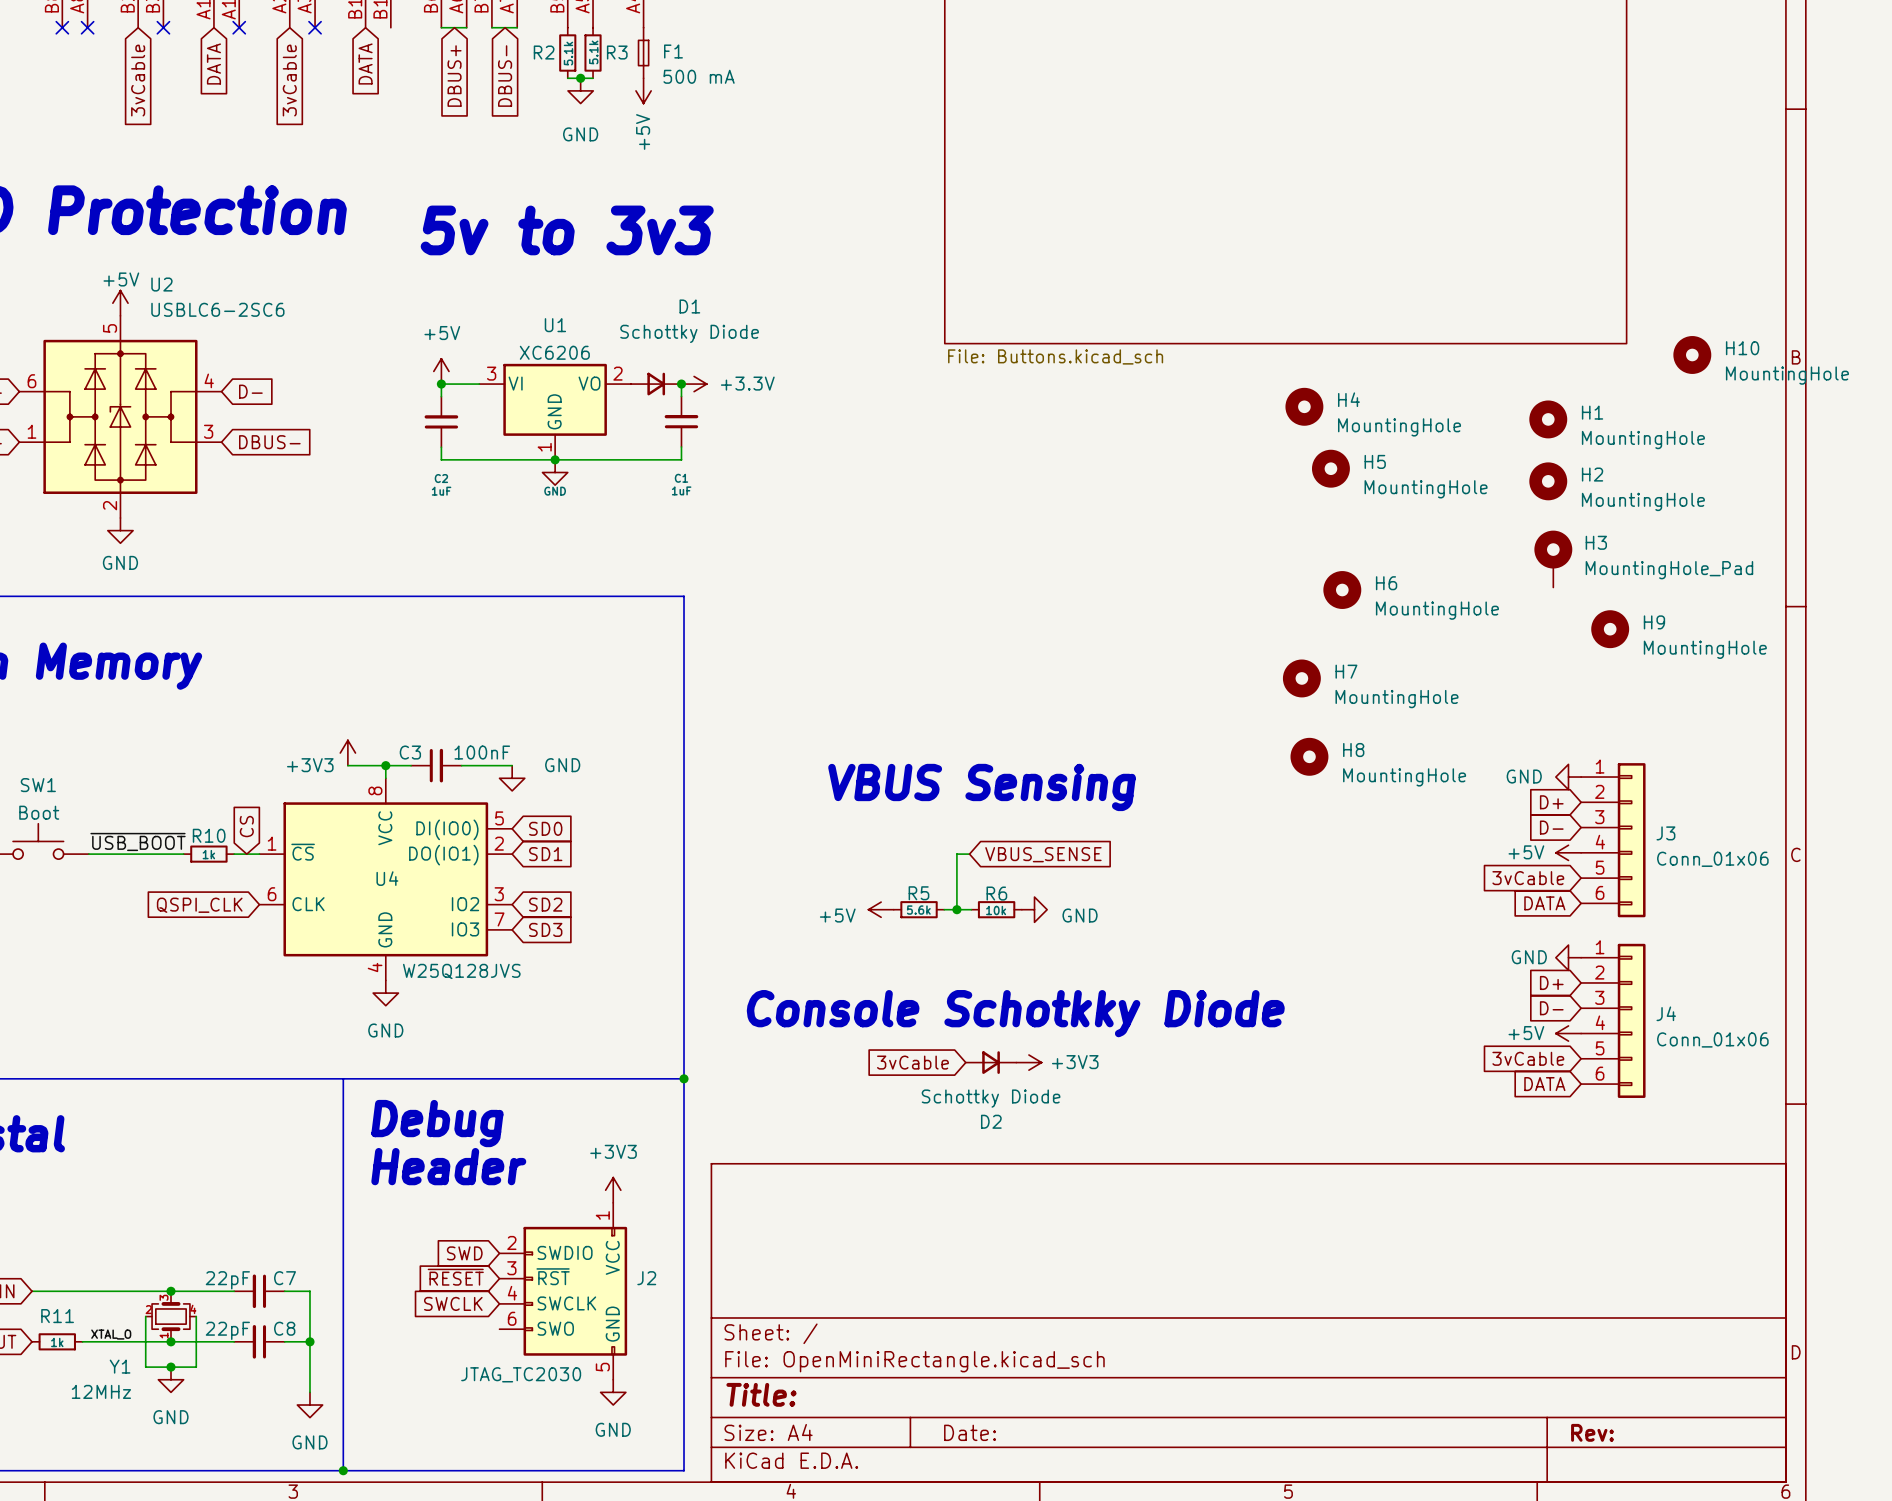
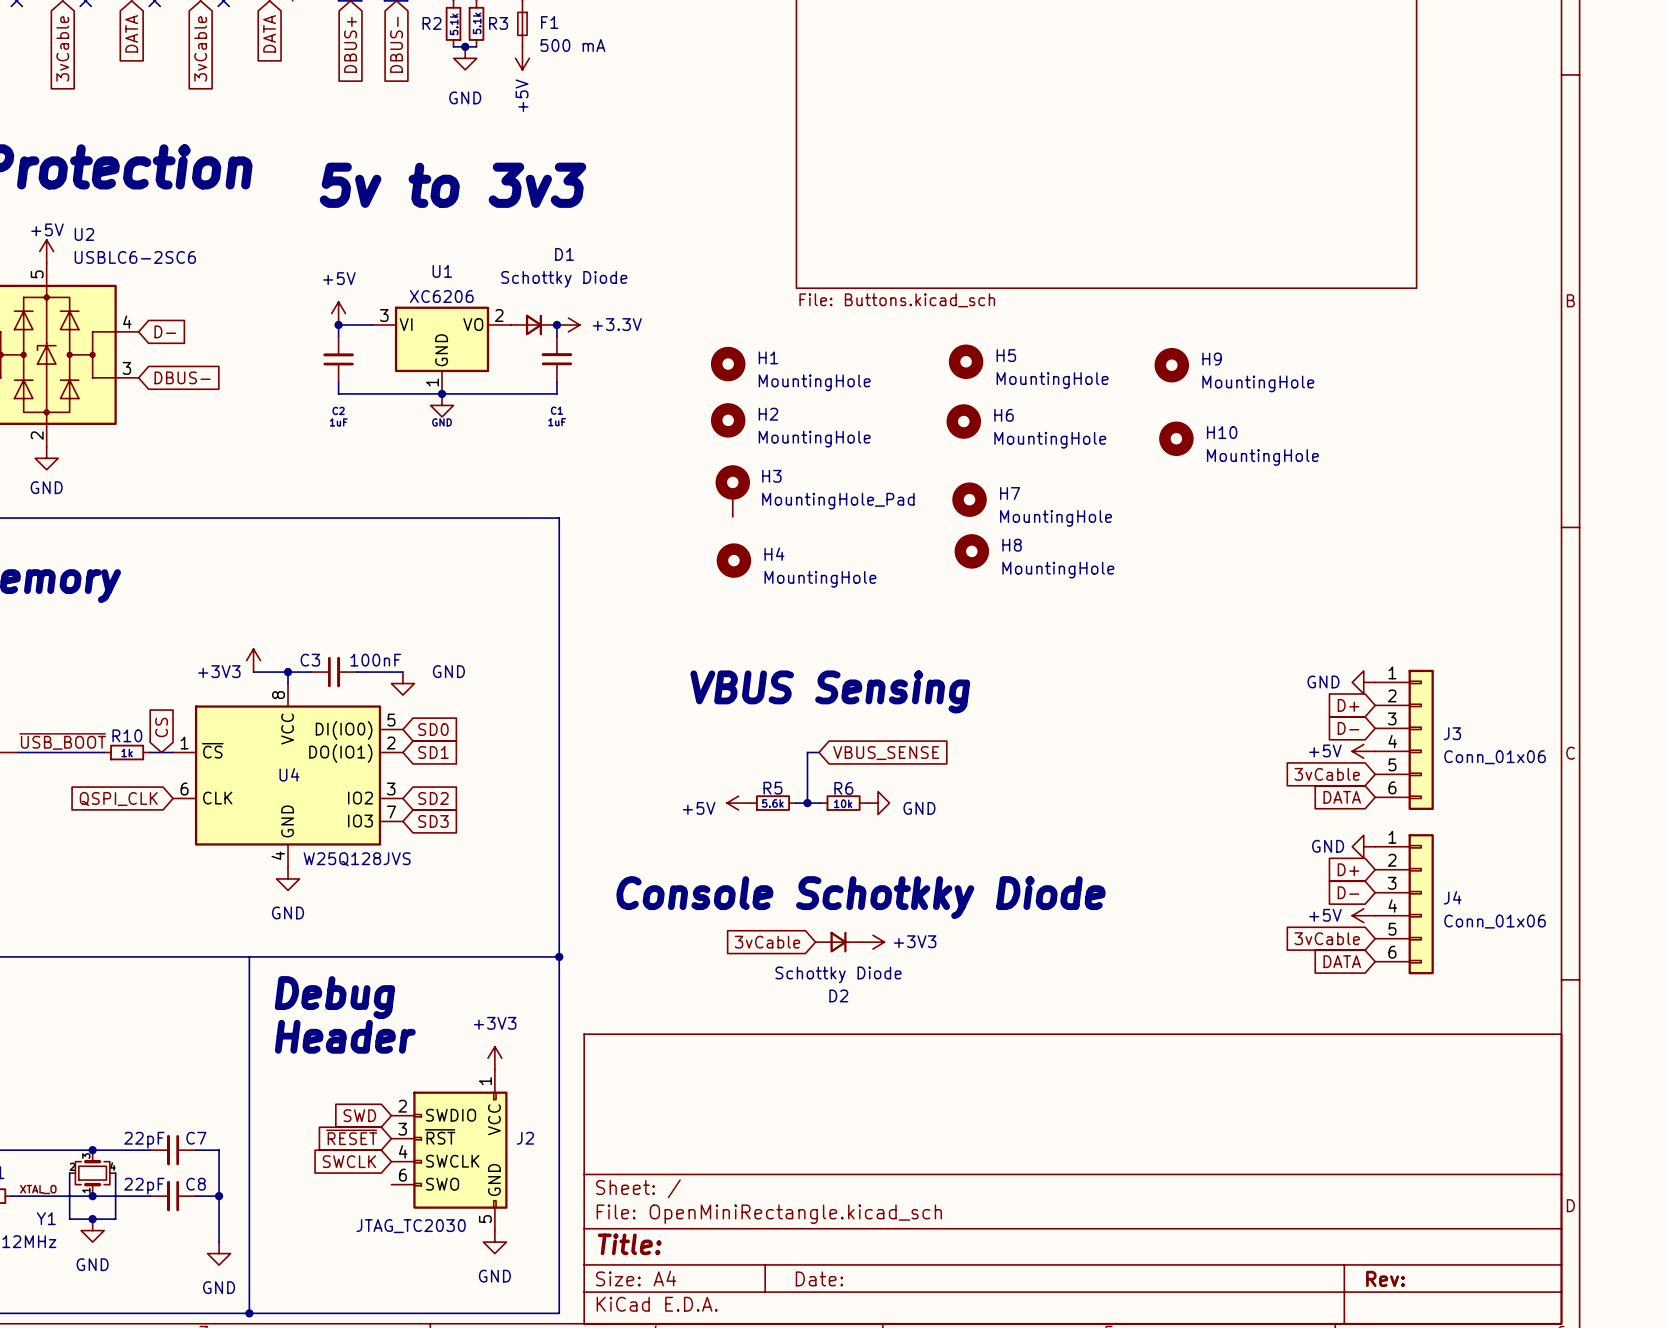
H10 position: (1692, 354) -> (1176, 438)
H4 position: (1304, 406) -> (733, 560)
H1 position: (1548, 419) -> (728, 364)
H5 position: (1330, 468) -> (966, 361)
H2 position: (1548, 481) -> (728, 420)
H3 position: (1553, 559) -> (732, 491)
H6 position: (1342, 590) -> (963, 421)
H9 position: (1610, 629) -> (1171, 365)
H7 position: (1301, 678) -> (969, 499)
H8 position: (1309, 756) -> (971, 551)

